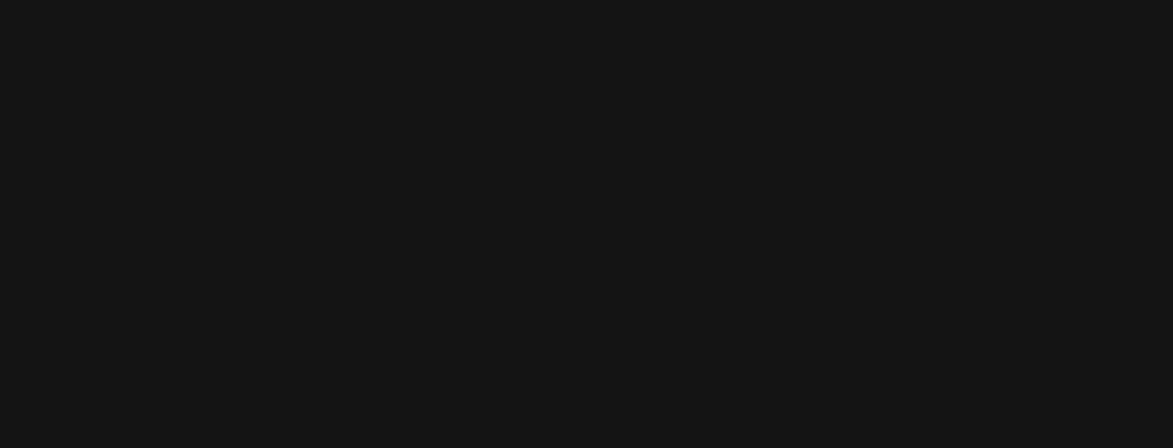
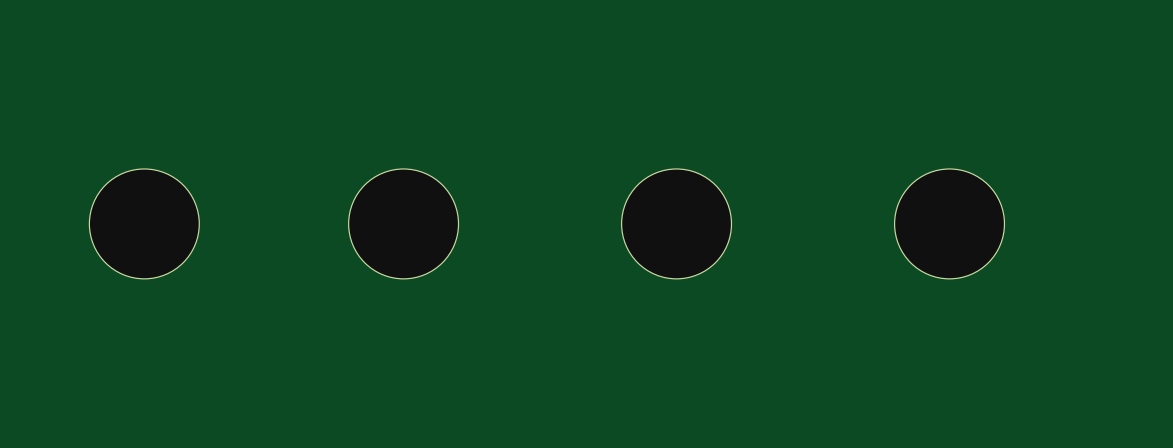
part: none -> (144, 223)
part: none -> (403, 223)
part: none -> (676, 223)
part: none -> (949, 223)

